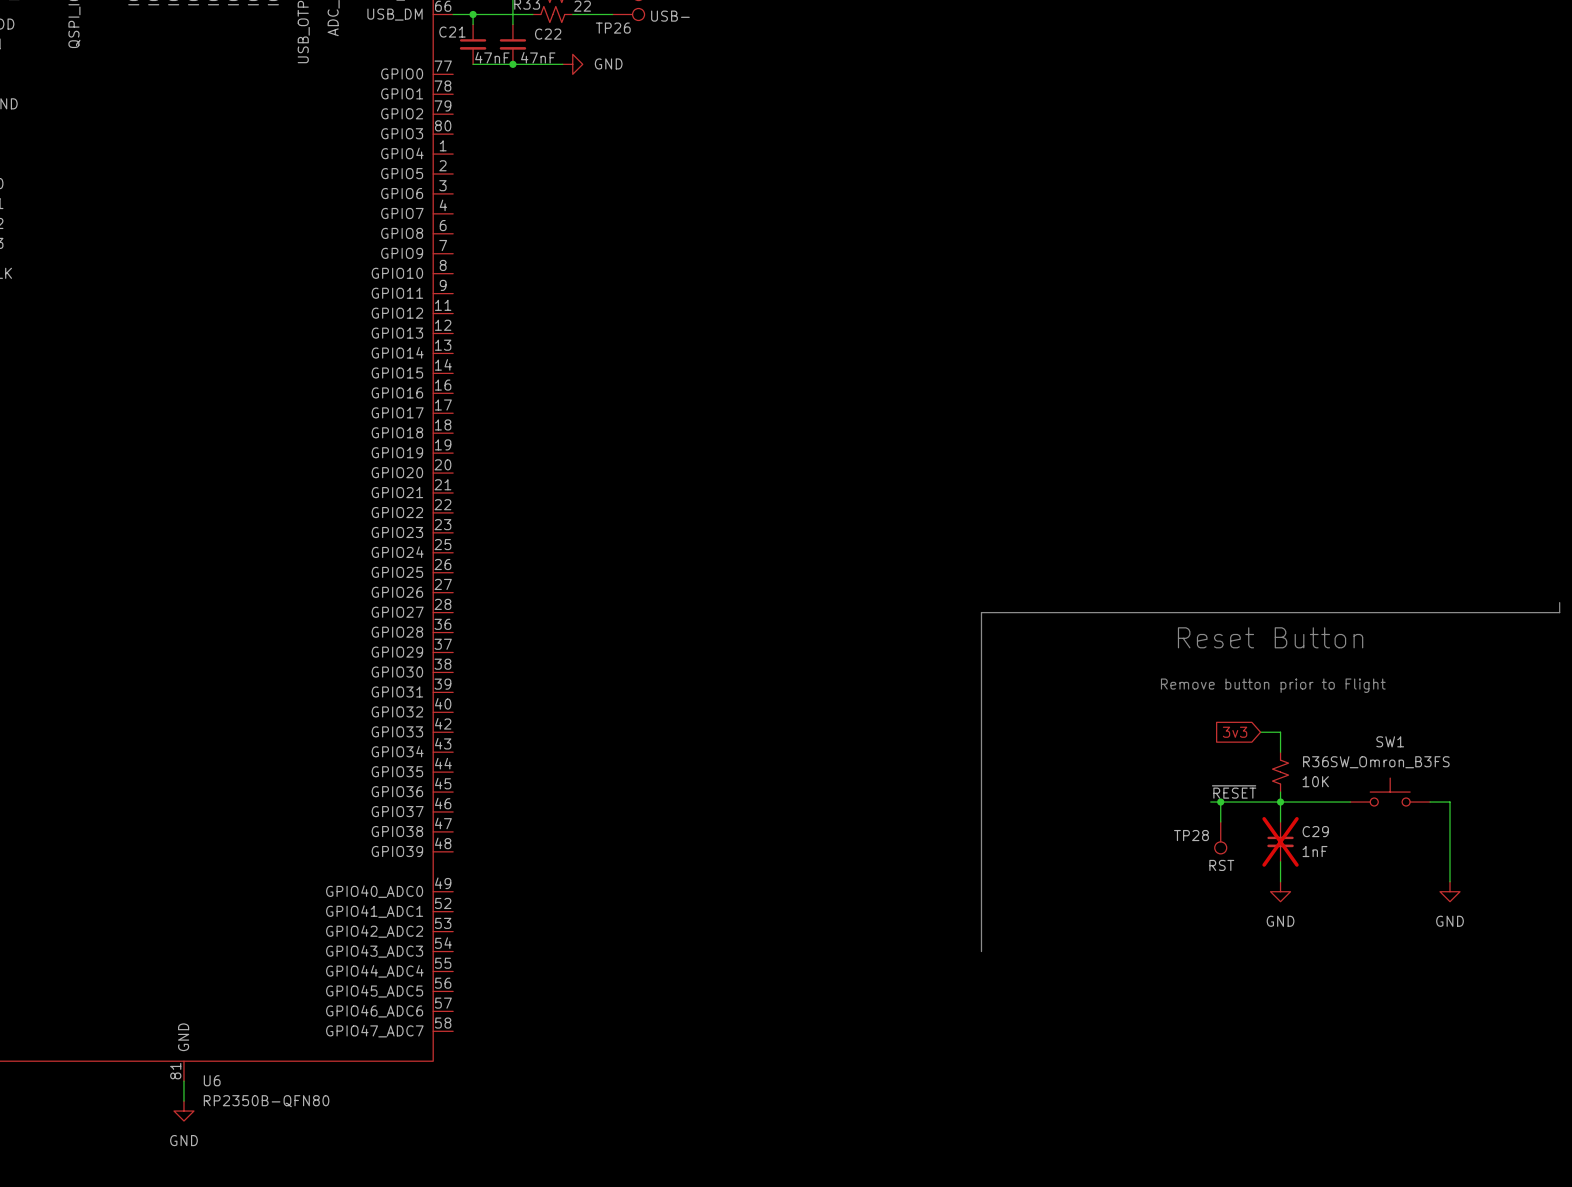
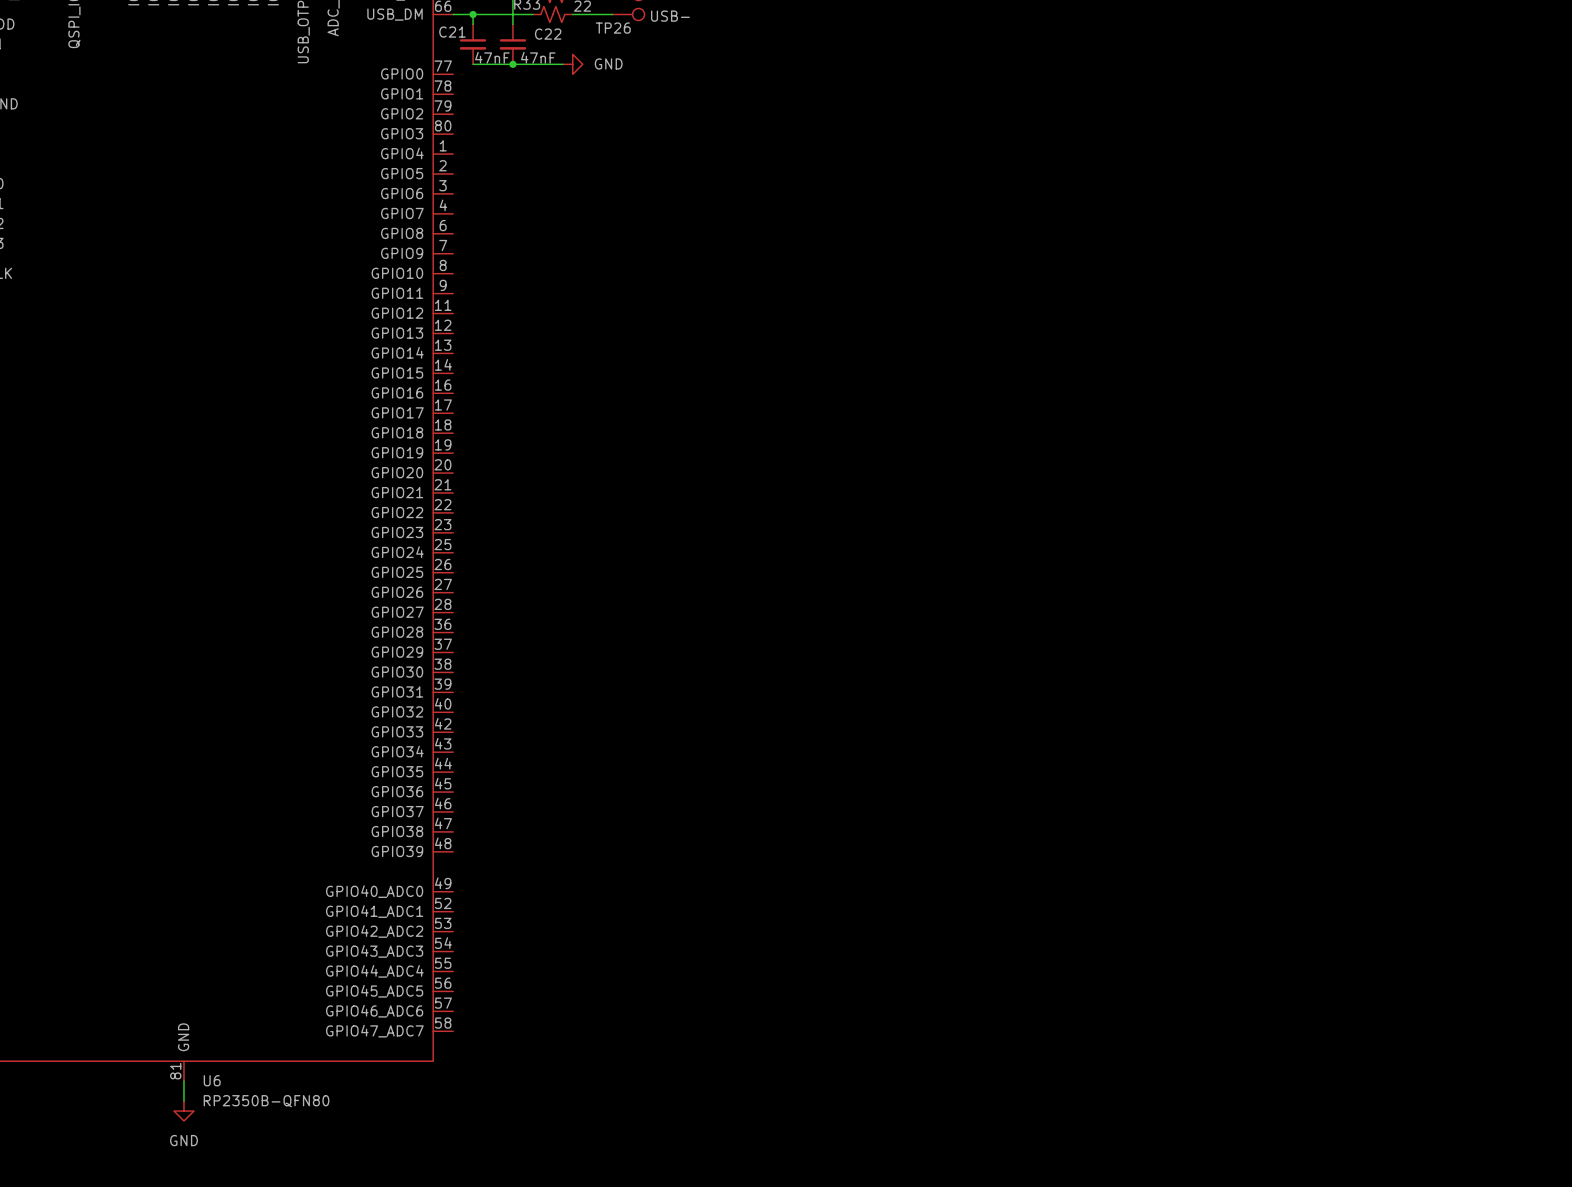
line: (1559, 602) (1559, 612) (981, 612) (981, 951) -> none
text: Reset Button (1270, 637) -> none
text: Remove button prior to Flight (1273, 685) -> none
global label: 3v3 (1235, 732) -> none
wire: (1260, 732) (1280, 732) (1280, 752) -> none
R36: 10K (1280, 772) -> none
label: ~{RESET} (1234, 791) -> none
wire: (1280, 792) (1280, 821) -> none
SW1: SW_Omron_B3FS (1390, 792) -> none
wire: (1210, 802) (1350, 802) -> none
wire: (1220, 802) (1220, 821) -> none
junction: (1220, 802) -> none
junction: (1280, 802) -> none
wire: (1430, 802) (1450, 802) (1450, 881) -> none
TP28: RST (1220, 837) -> none
C29: 1nF (1280, 841) -> none
wire: (1280, 861) (1280, 881) -> none
power symbol: GND (1280, 891) -> none
power symbol: GND (1450, 891) -> none

